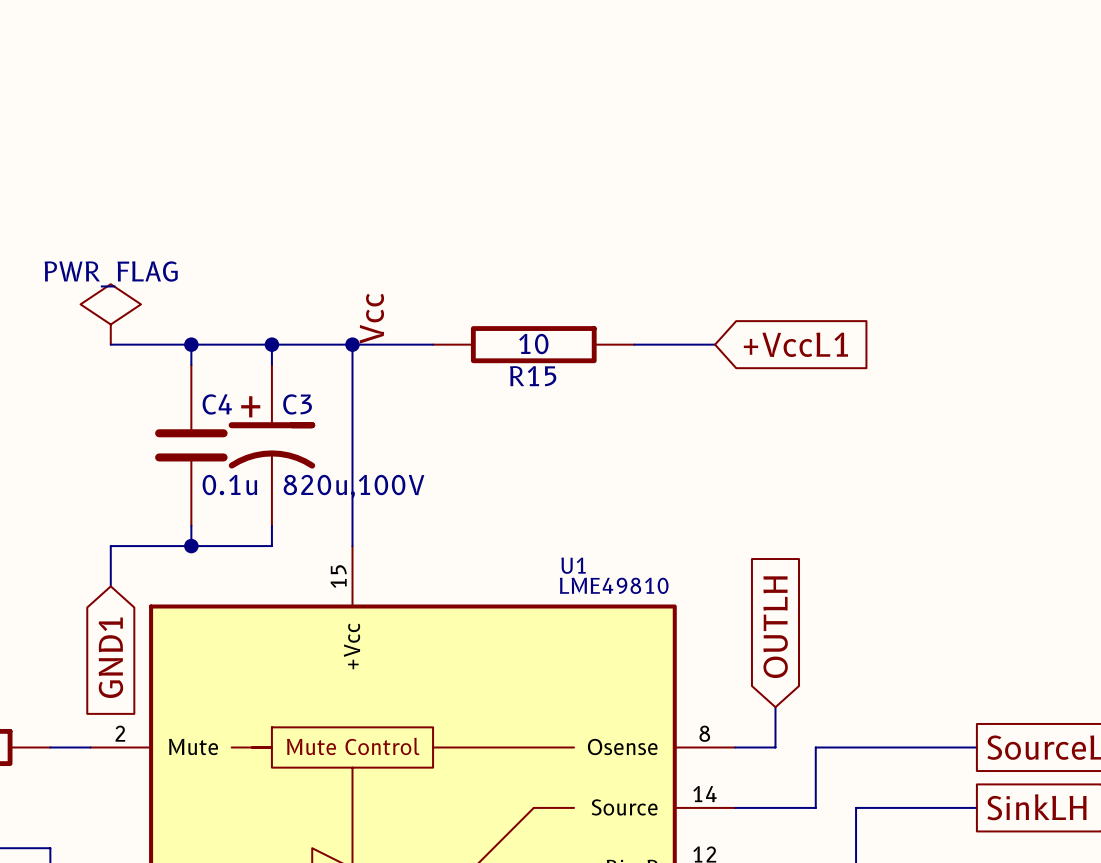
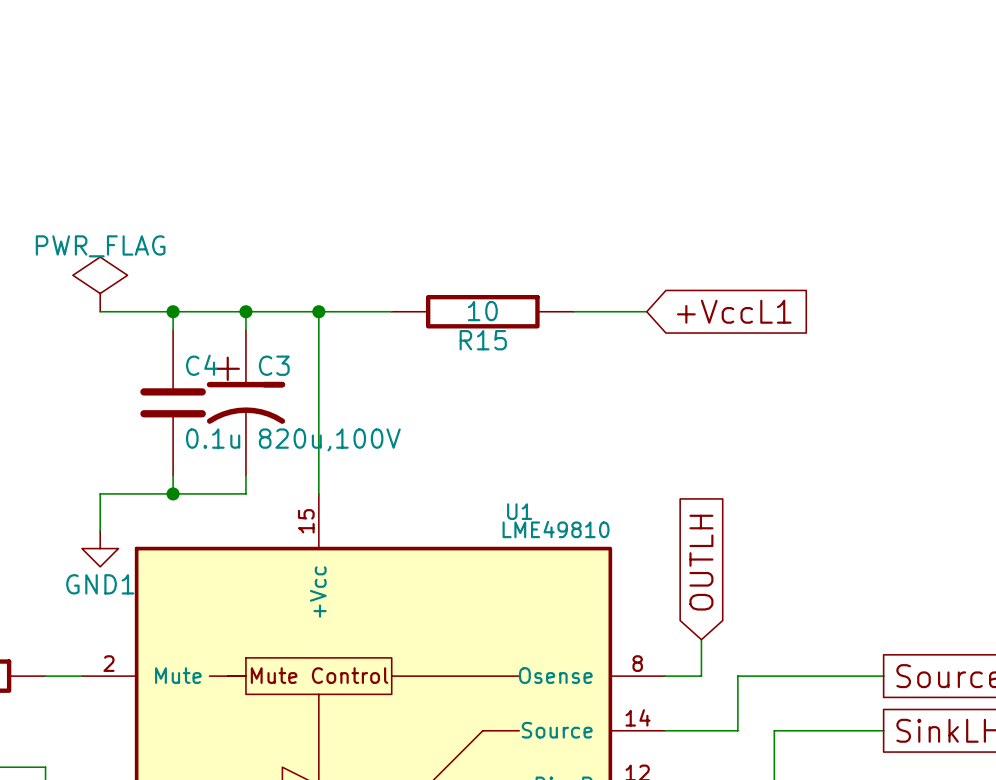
label: Vcc (371, 318) -> none
power symbol: none -> GND1 (100, 548)
global label: GND1 (110, 657) -> none

